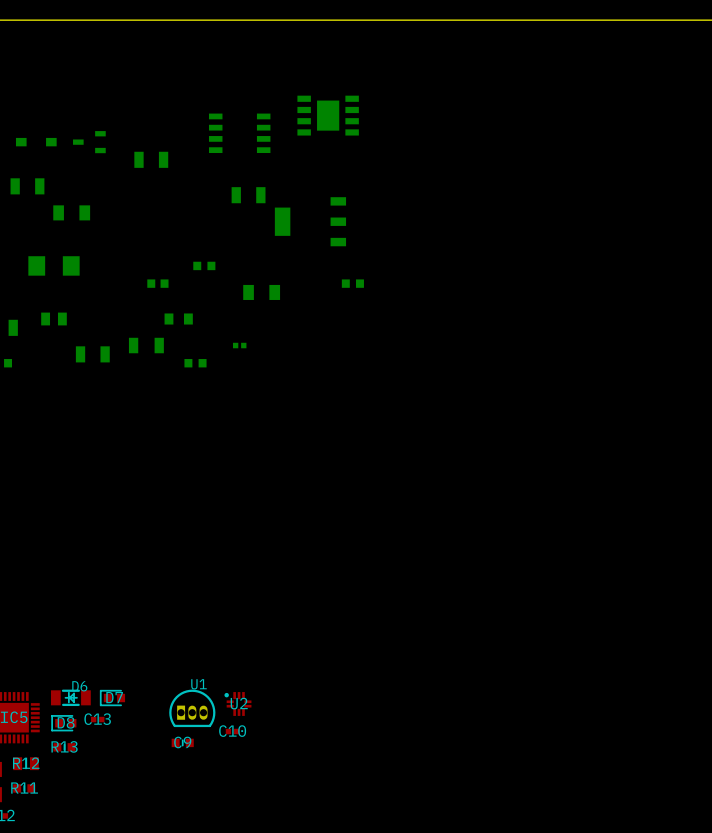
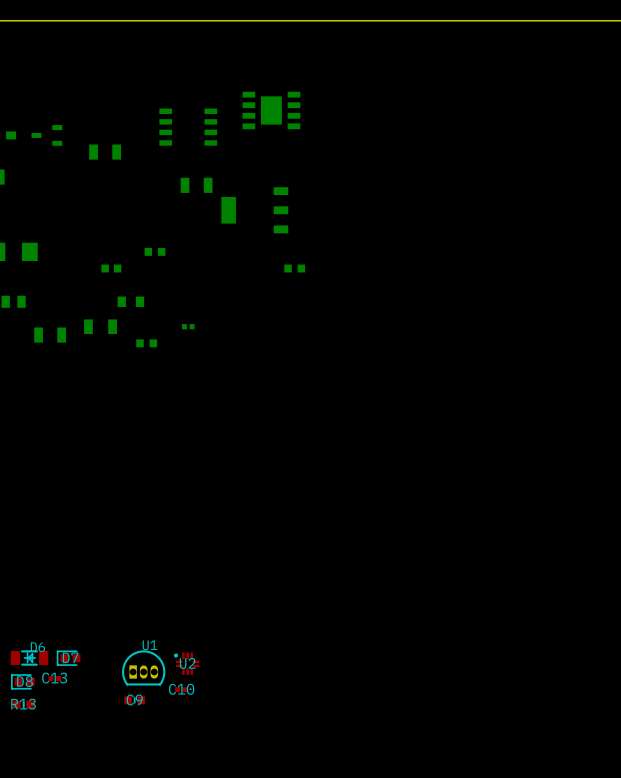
part: (71, 212) -> none
part: (261, 292) -> none

